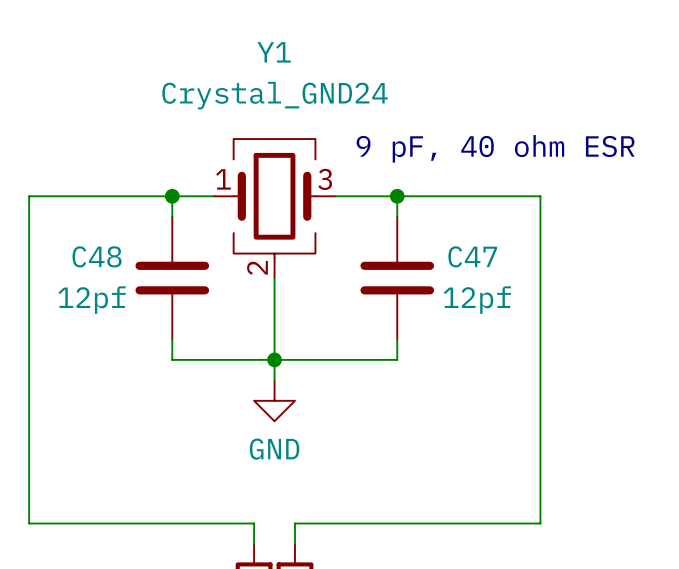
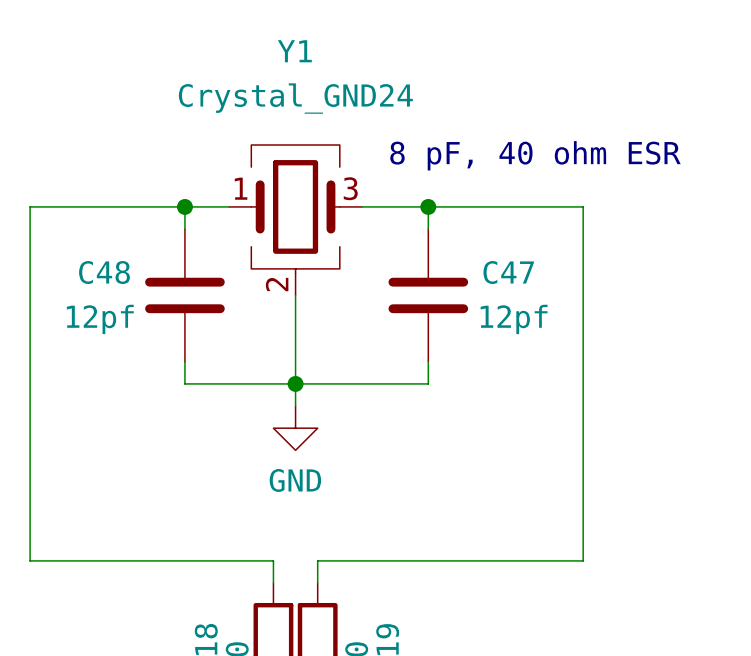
text: 9 pF, 40 ohm ESR (495, 148) -> 8 pF, 40 ohm ESR (535, 155)

